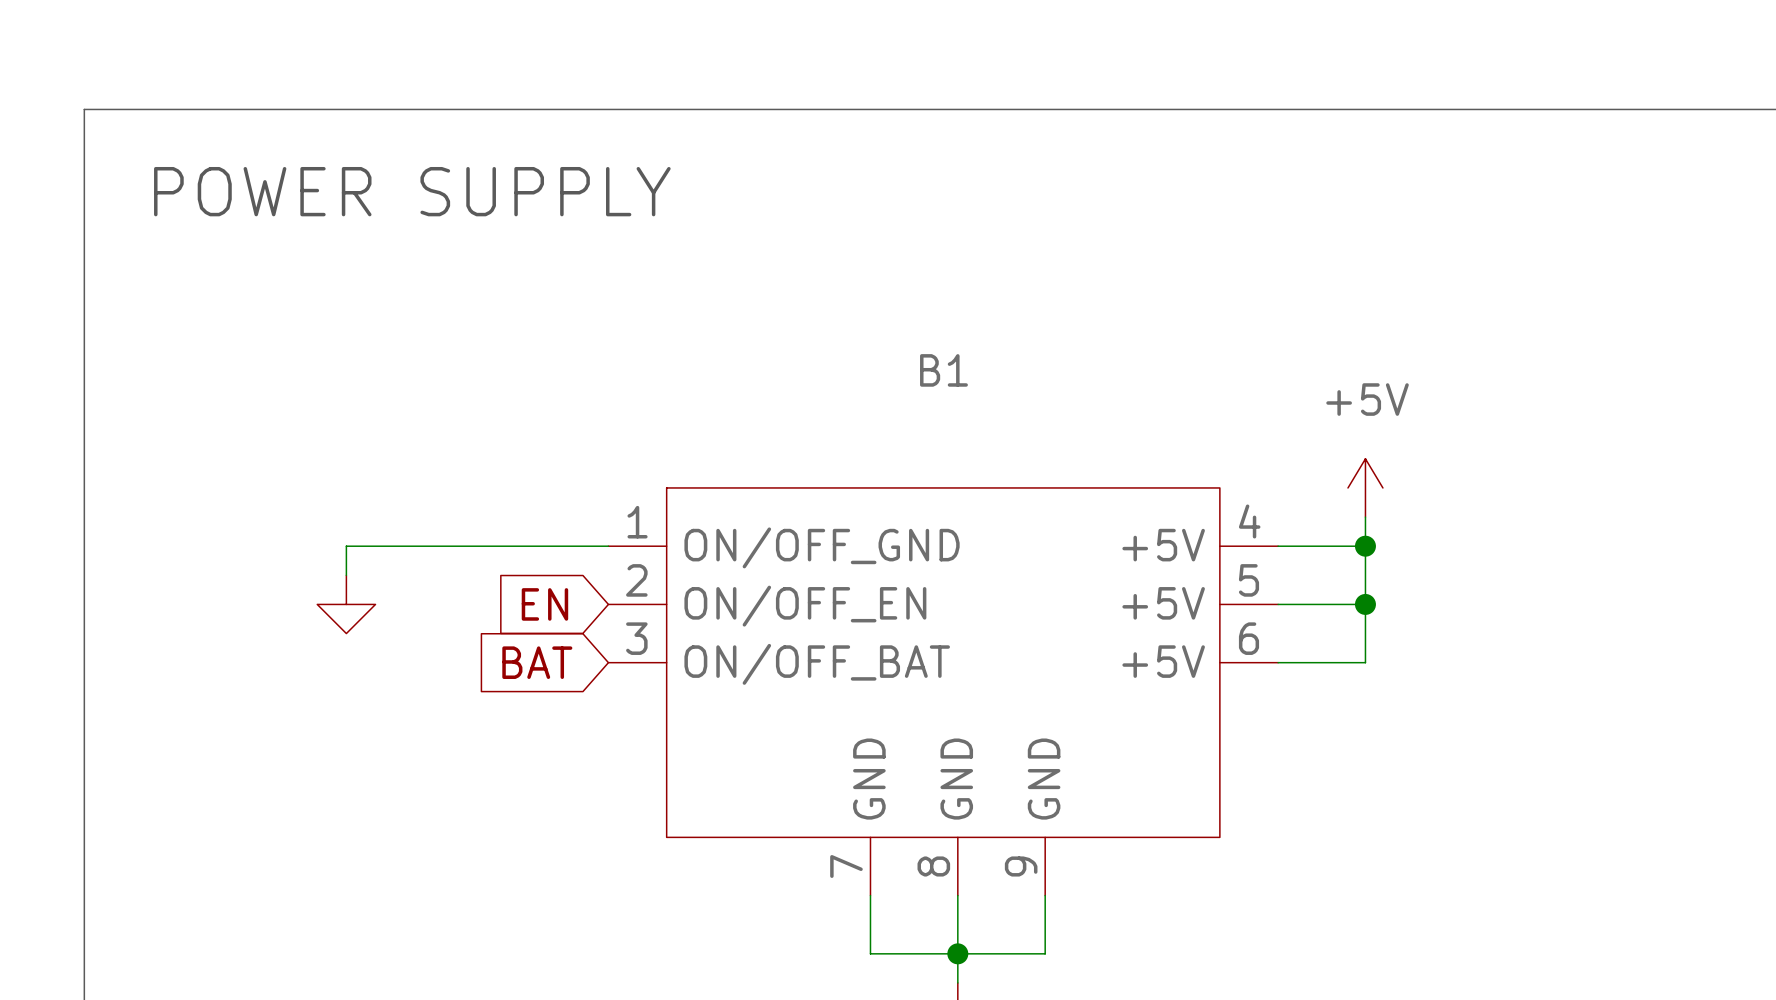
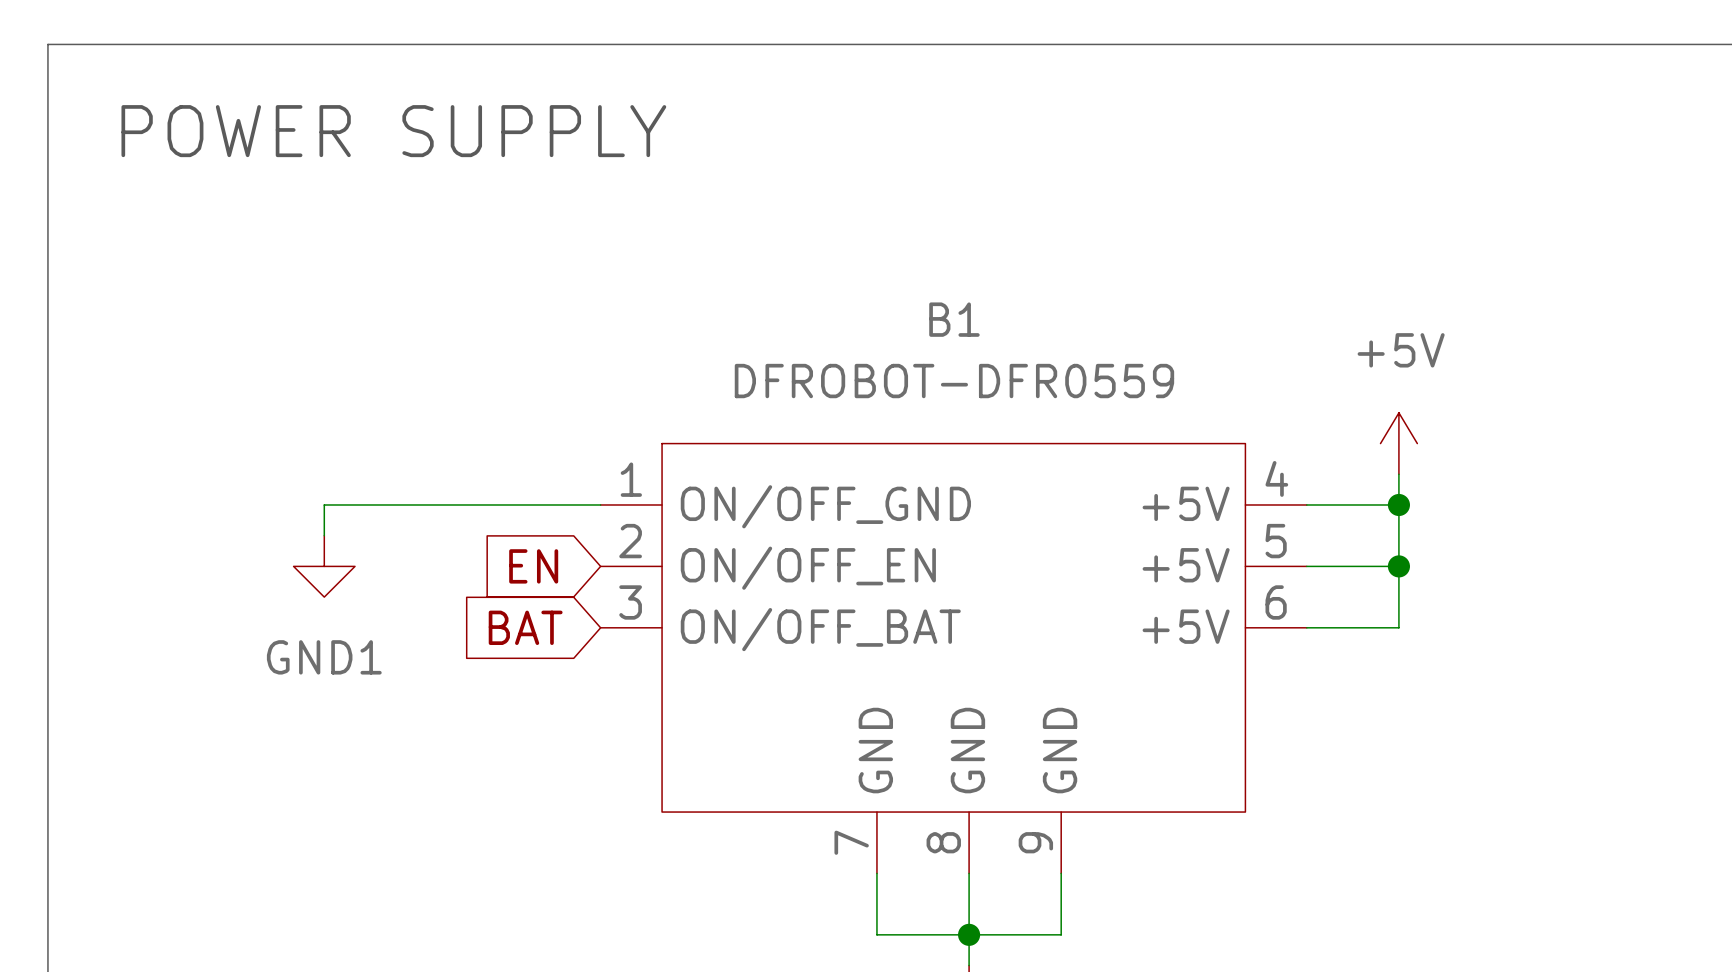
B1 value: none -> DFROBOT-DFR0559 (954, 381)
power symbol text: none -> GND1 (324, 657)

